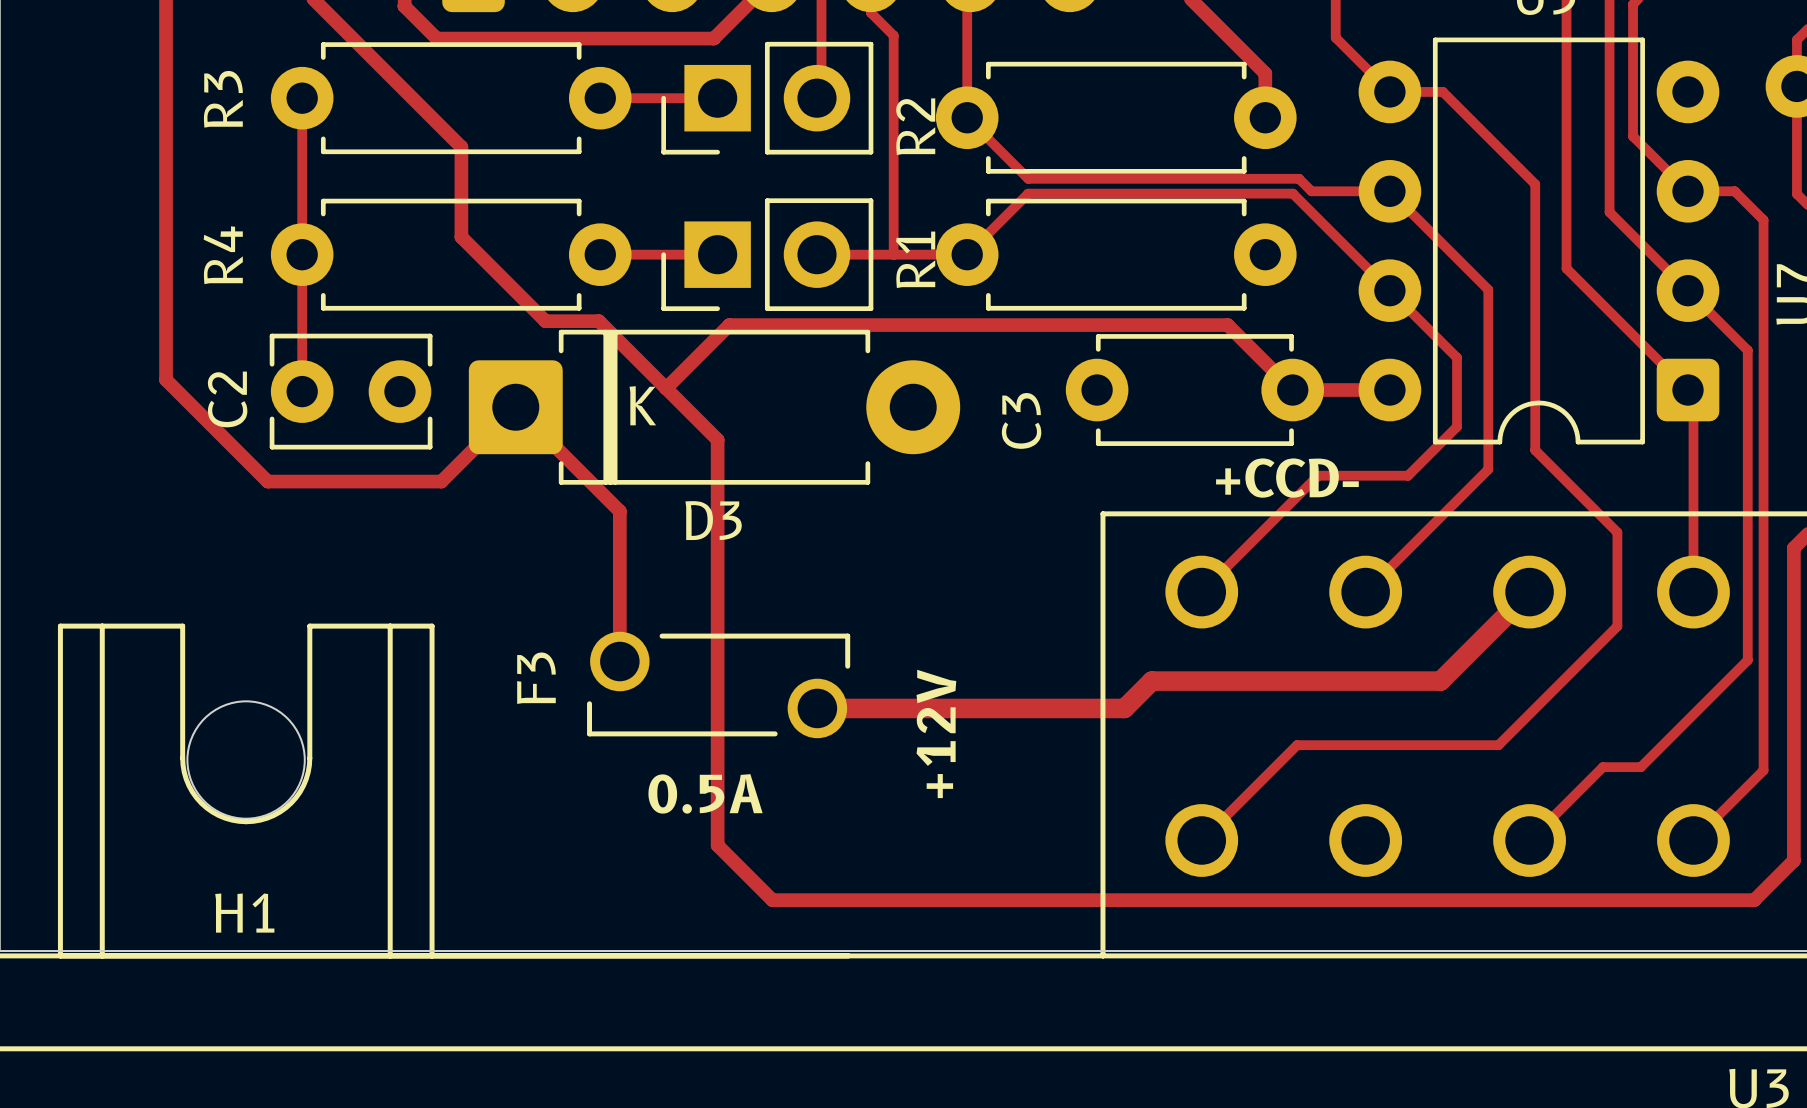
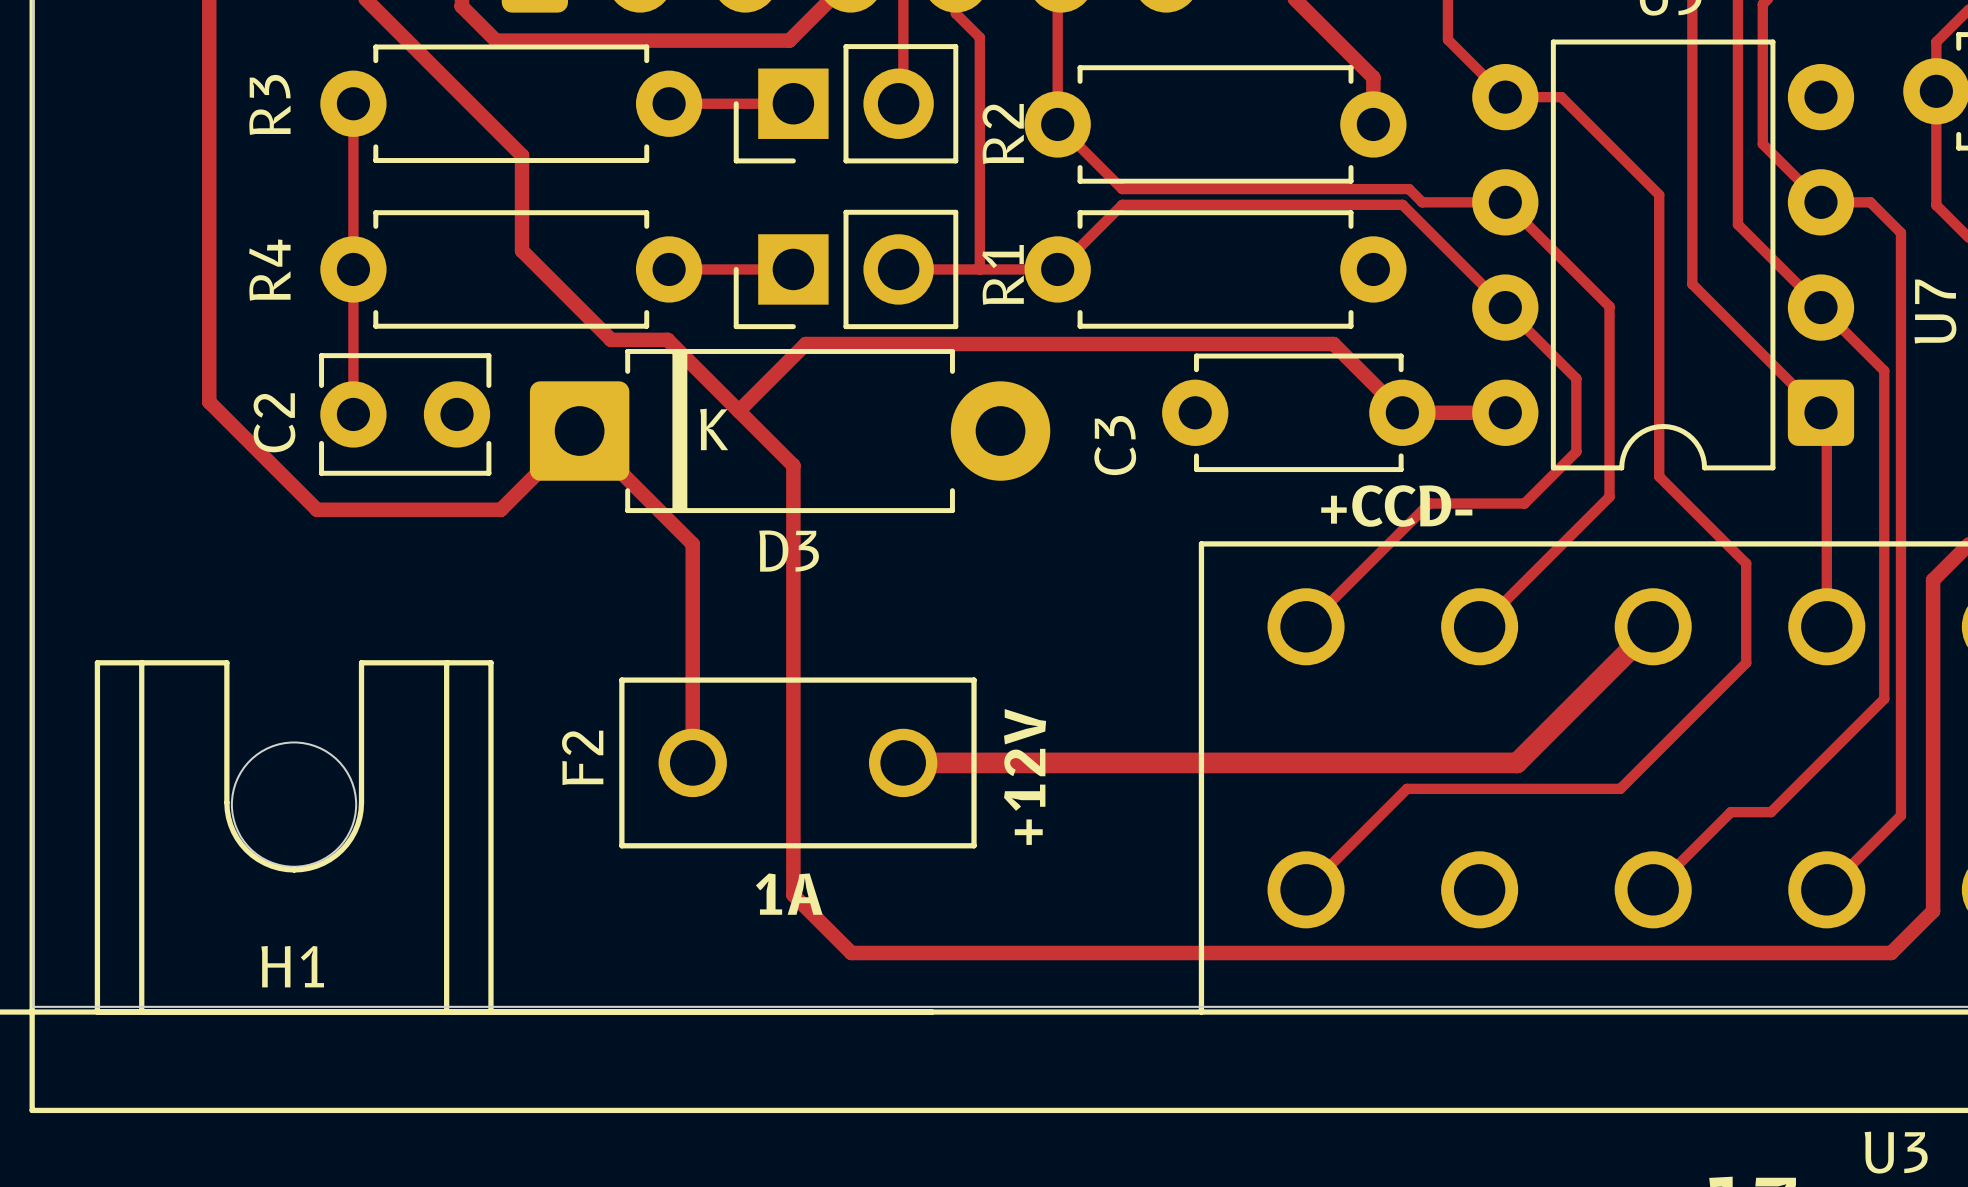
track: (619, 511) (619, 661) -> (689, 541) (692, 544) (692, 762)
track: (1440, 681) (1151, 681) (1124, 708) (817, 708) -> (1558, 721) (1517, 762) (903, 762)
F3: (718, 684) -> none
F2: none -> (797, 762)
text: 0.5A (705, 793) -> none
text: none -> 1A (789, 894)

